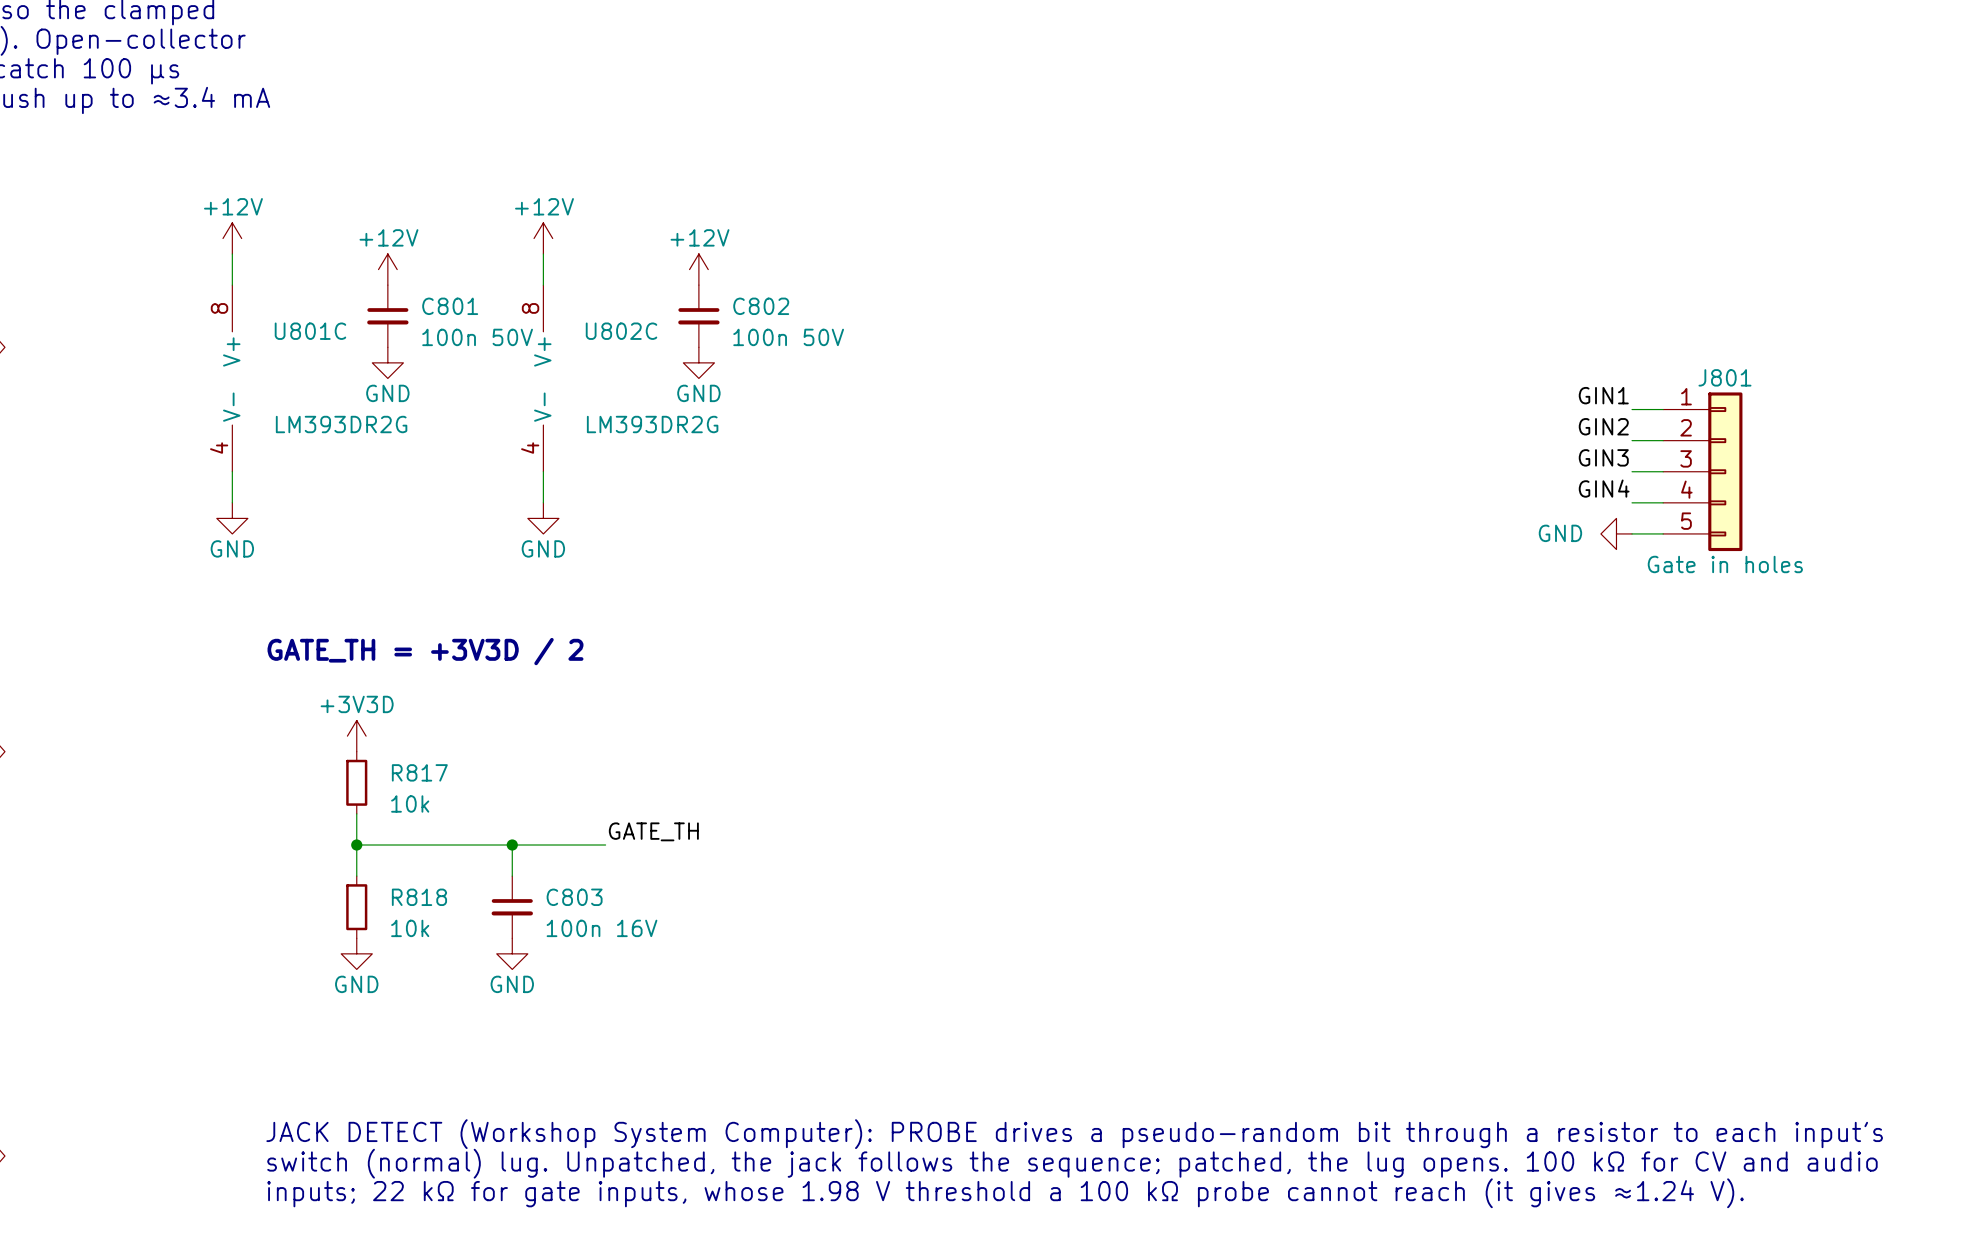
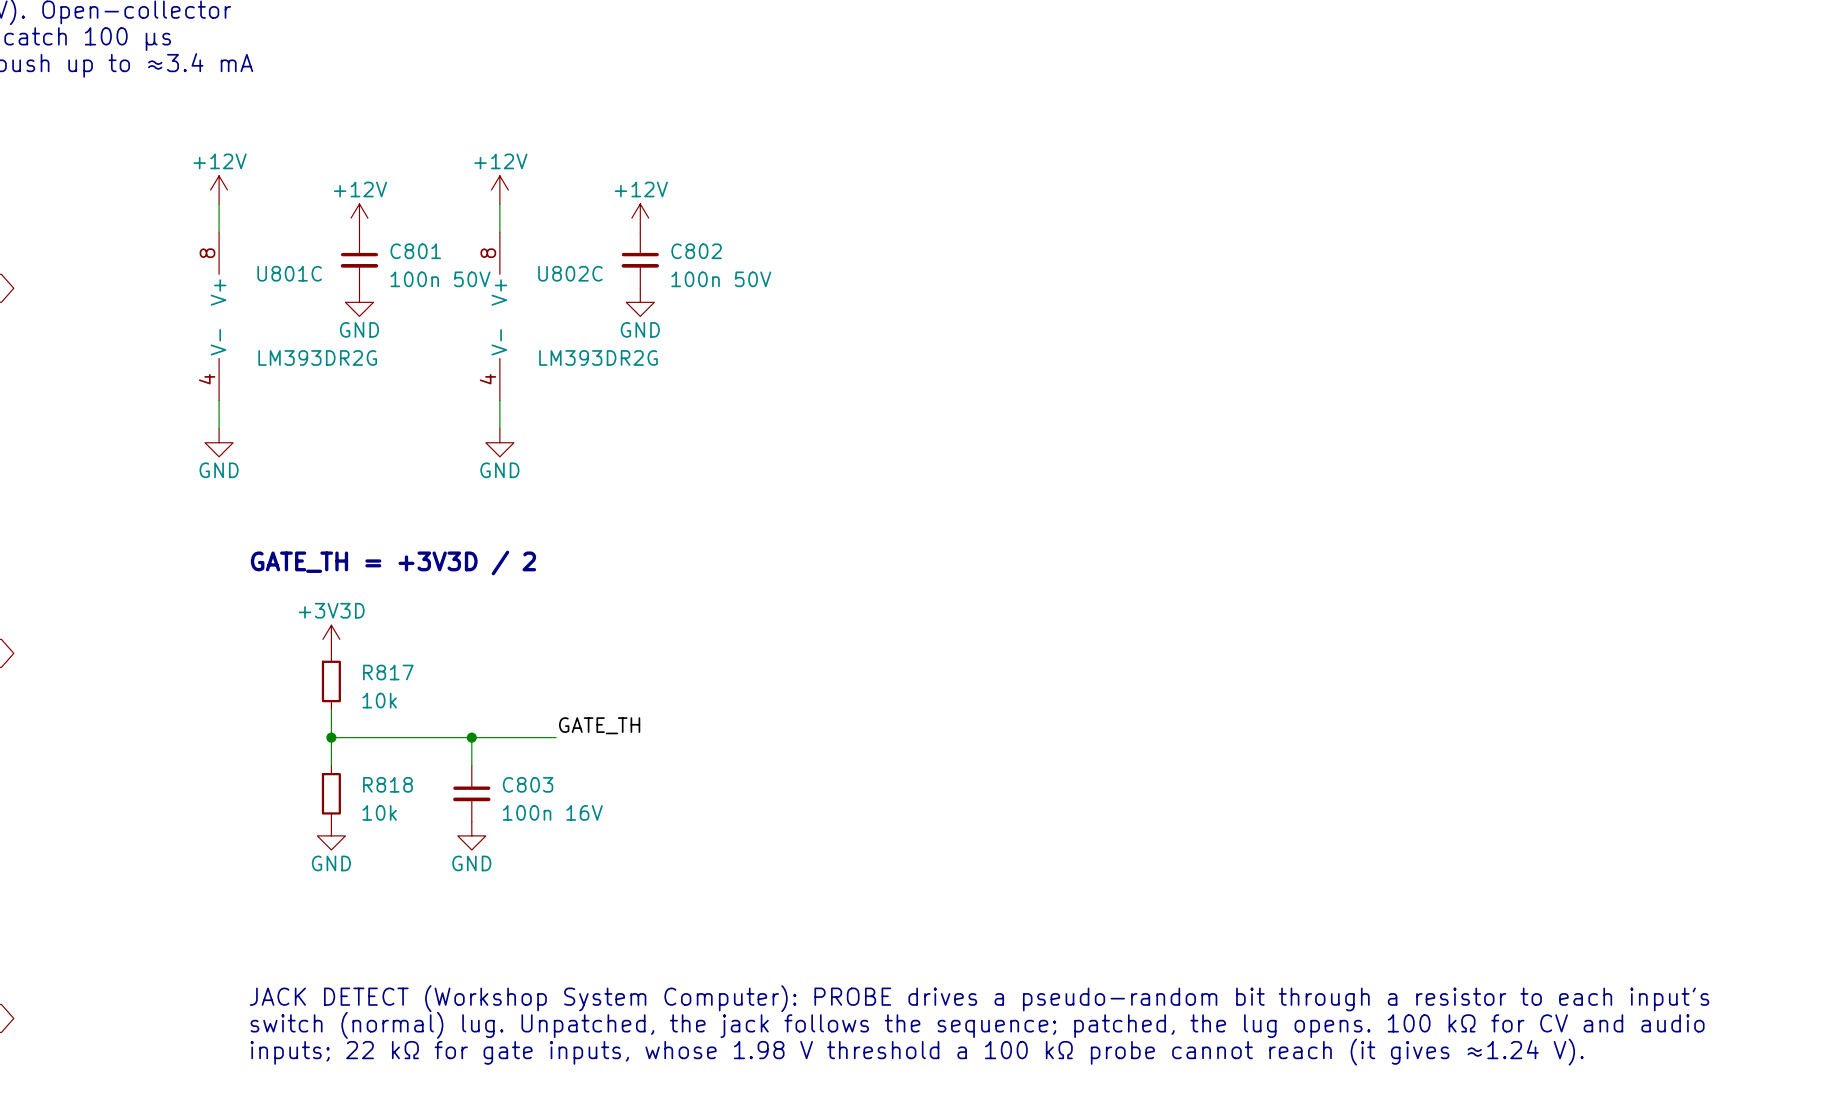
label: GIN1 (1603, 395) -> none
wire: (1632, 409) (1663, 409) -> none
label: GIN2 (1603, 426) -> none
wire: (1632, 440) (1663, 440) -> none
label: GIN3 (1603, 457) -> none
wire: (1632, 471) (1663, 471) -> none
J801: Gate in holes (1702, 471) -> none
label: GIN4 (1604, 488) -> none
wire: (1632, 502) (1663, 502) -> none
power symbol: GND (1616, 533) -> none
wire: (1632, 533) (1663, 533) -> none

